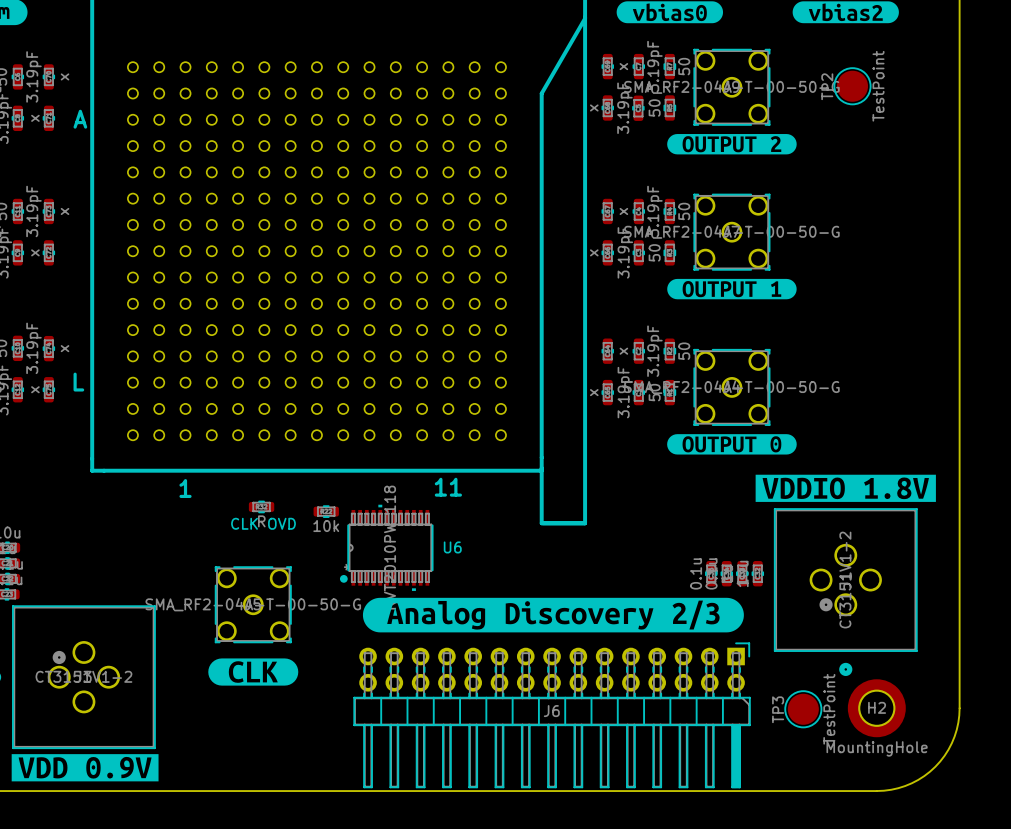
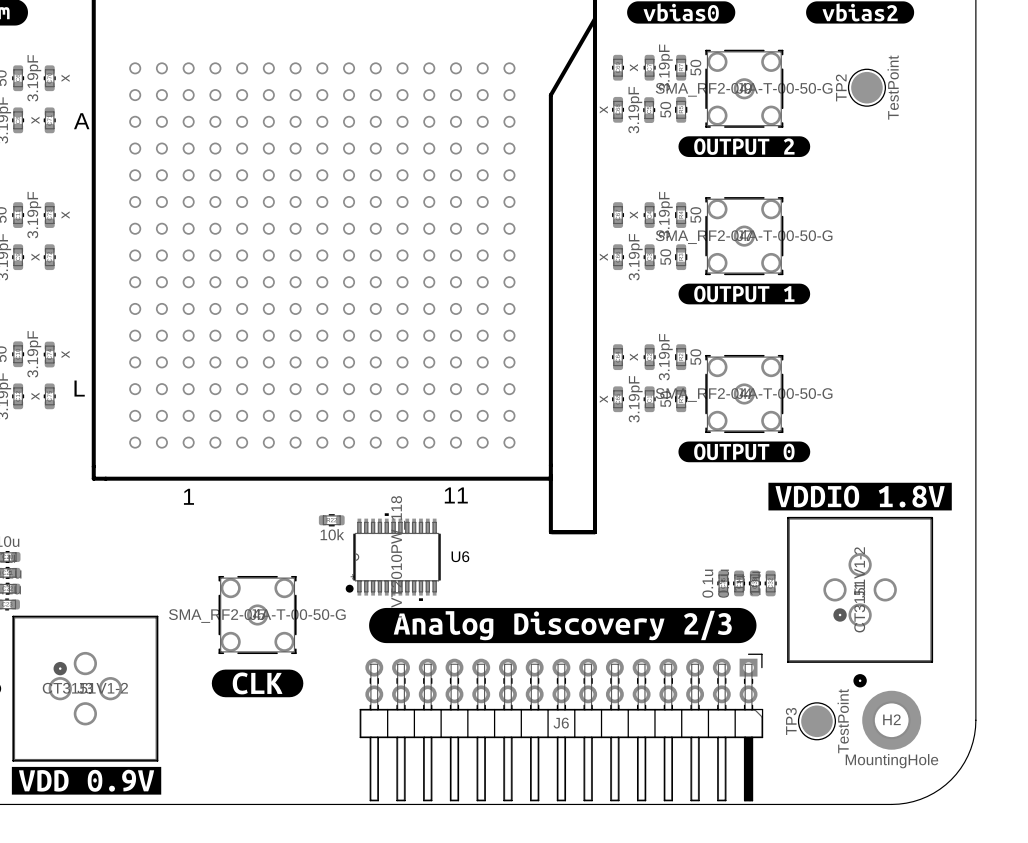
part: R (261, 506) -> none
text: CLK OVD (263, 523) -> none

